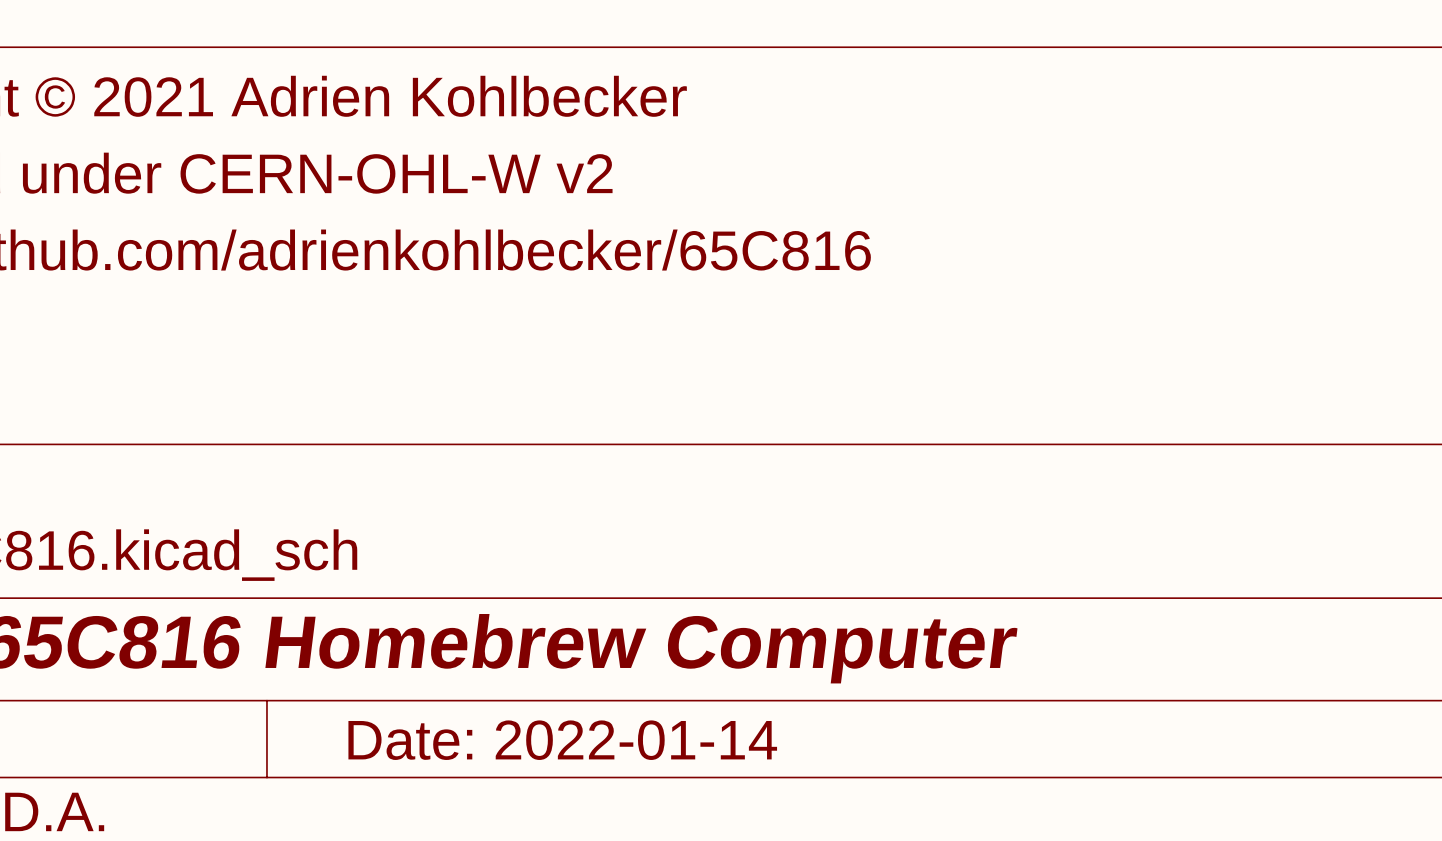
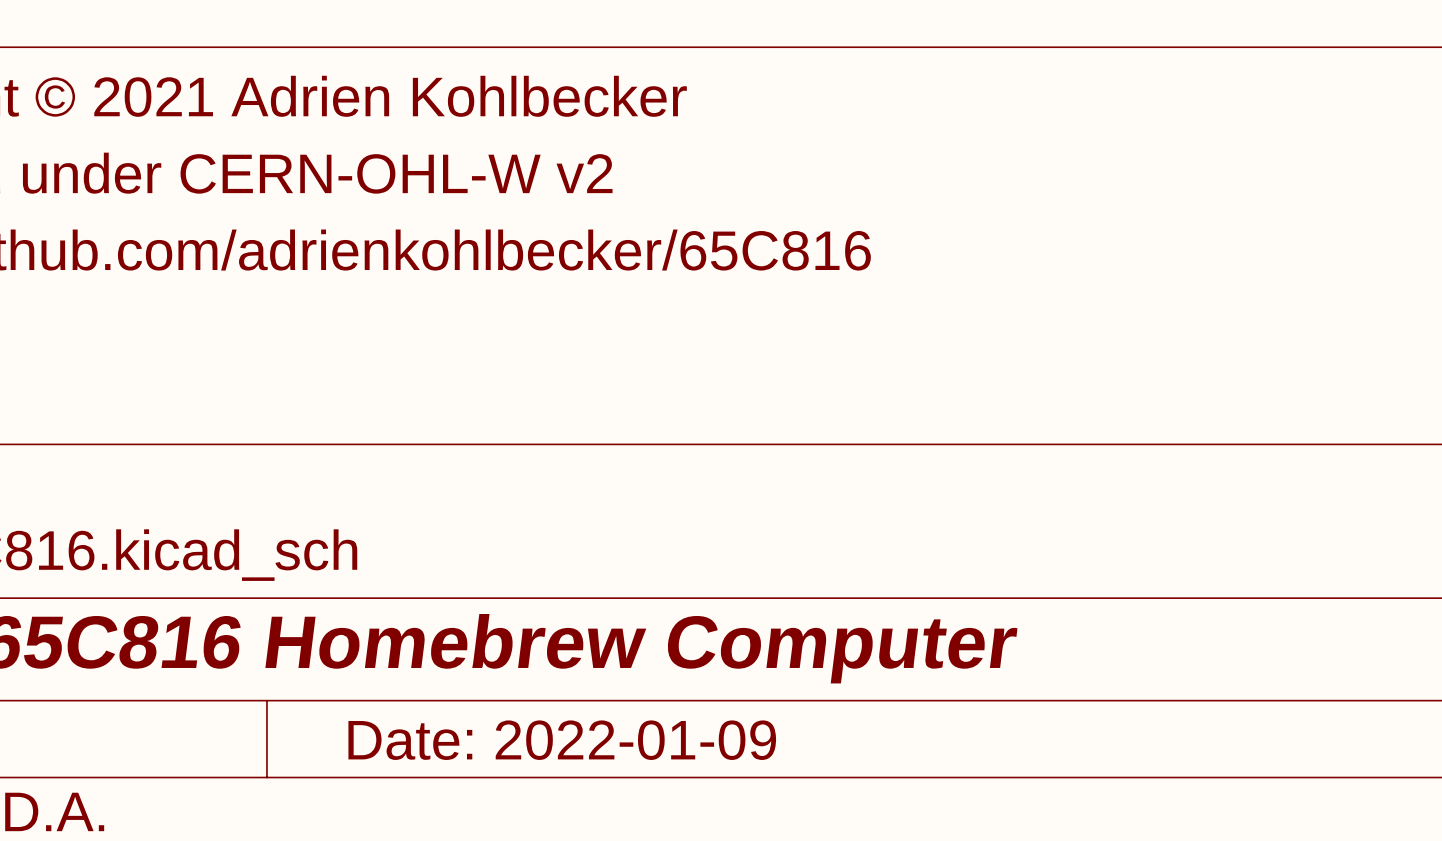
title block: Date: 2022-01-14 (562, 740) -> Date: 2022-01-09 (562, 740)

